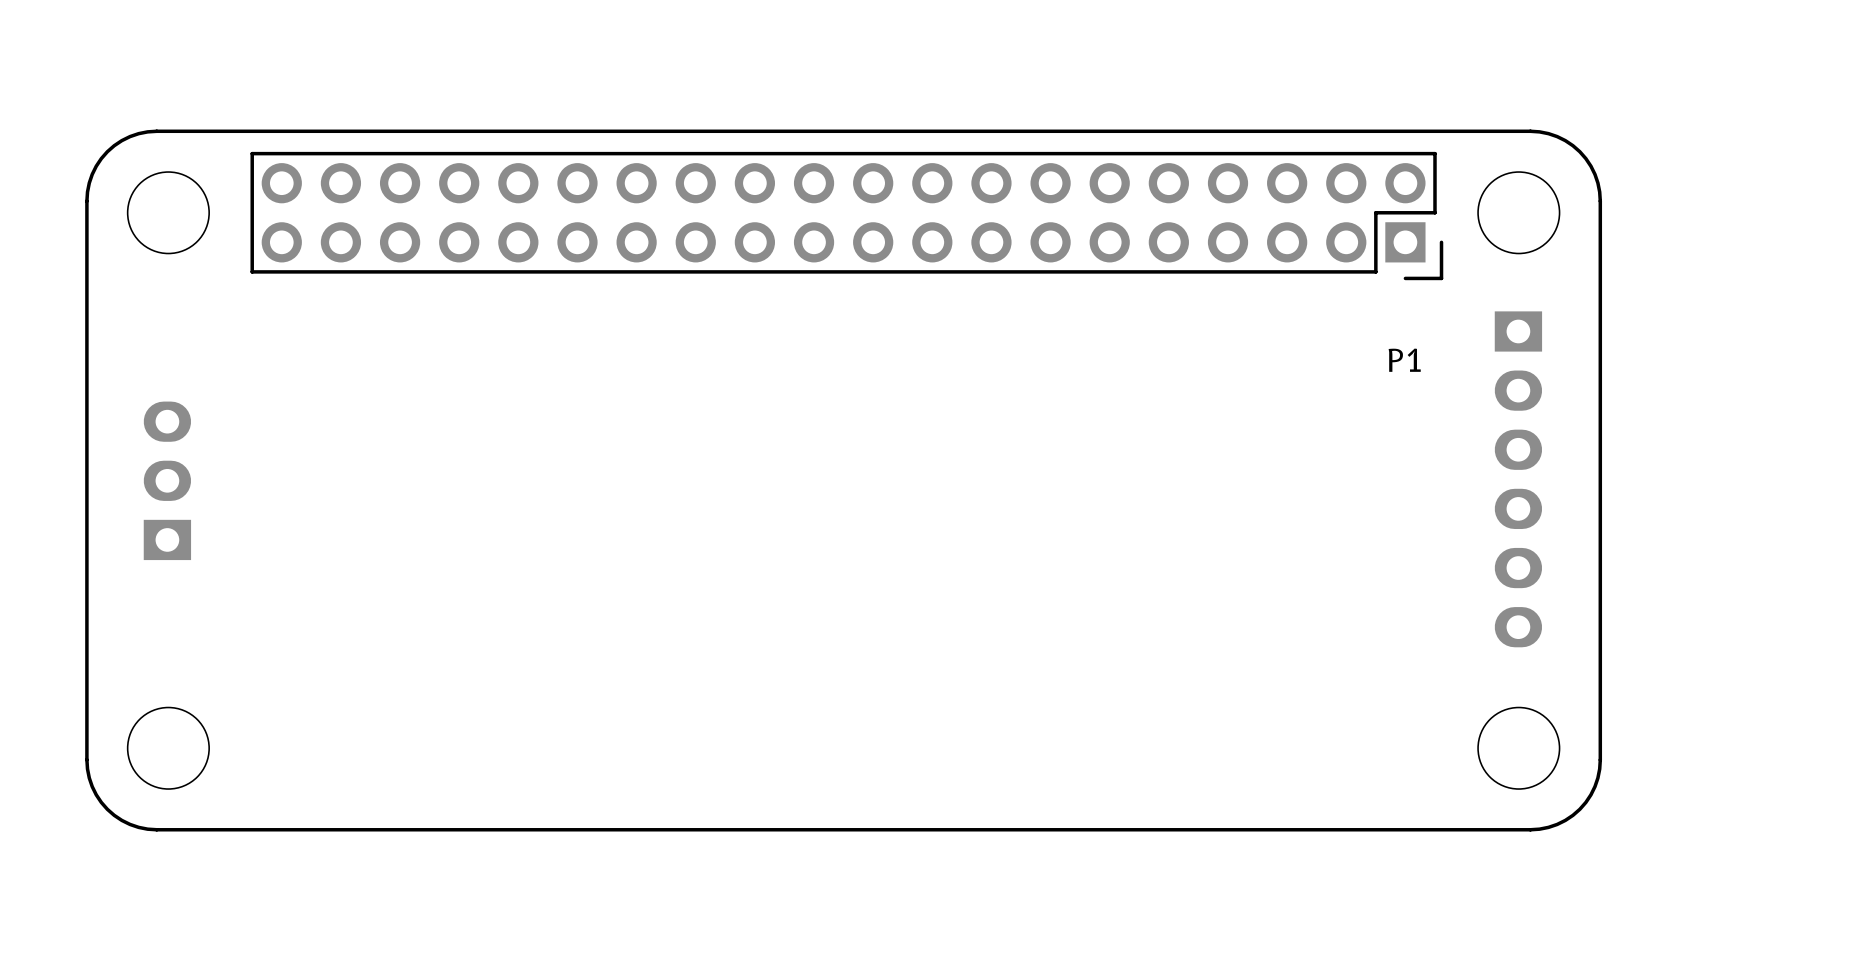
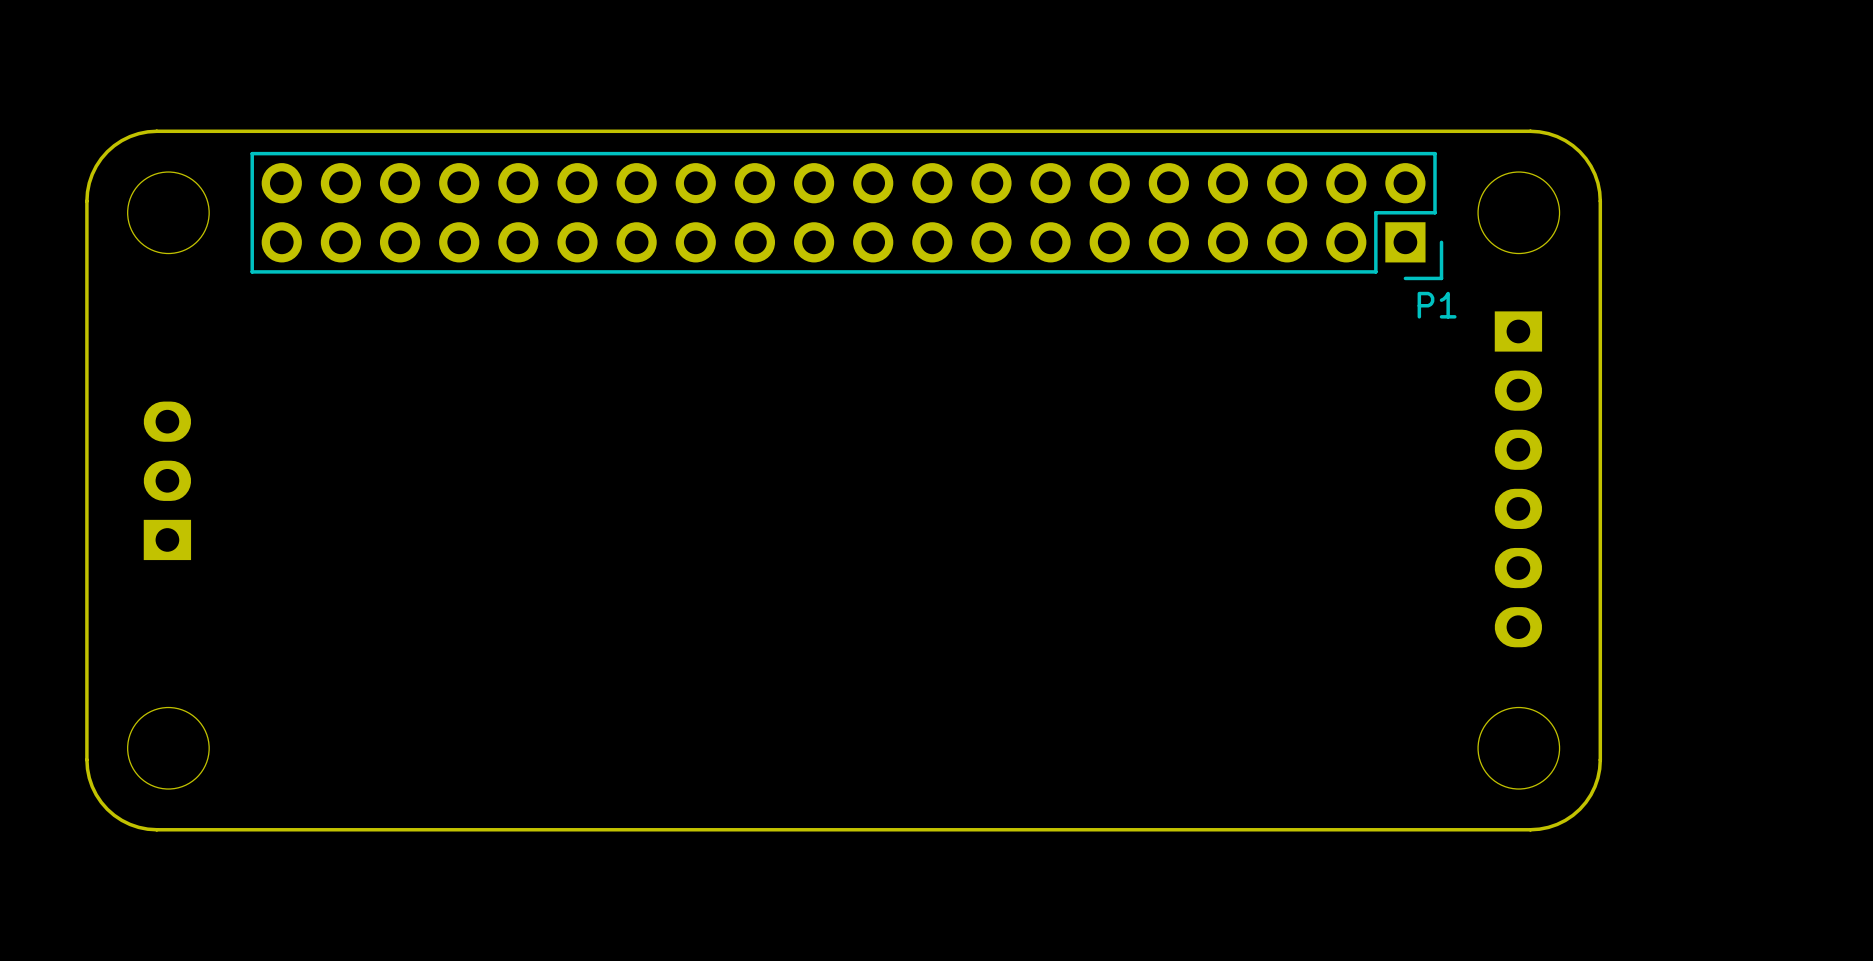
P1 name position: P1 (1404, 360) -> P1 (1437, 305)

